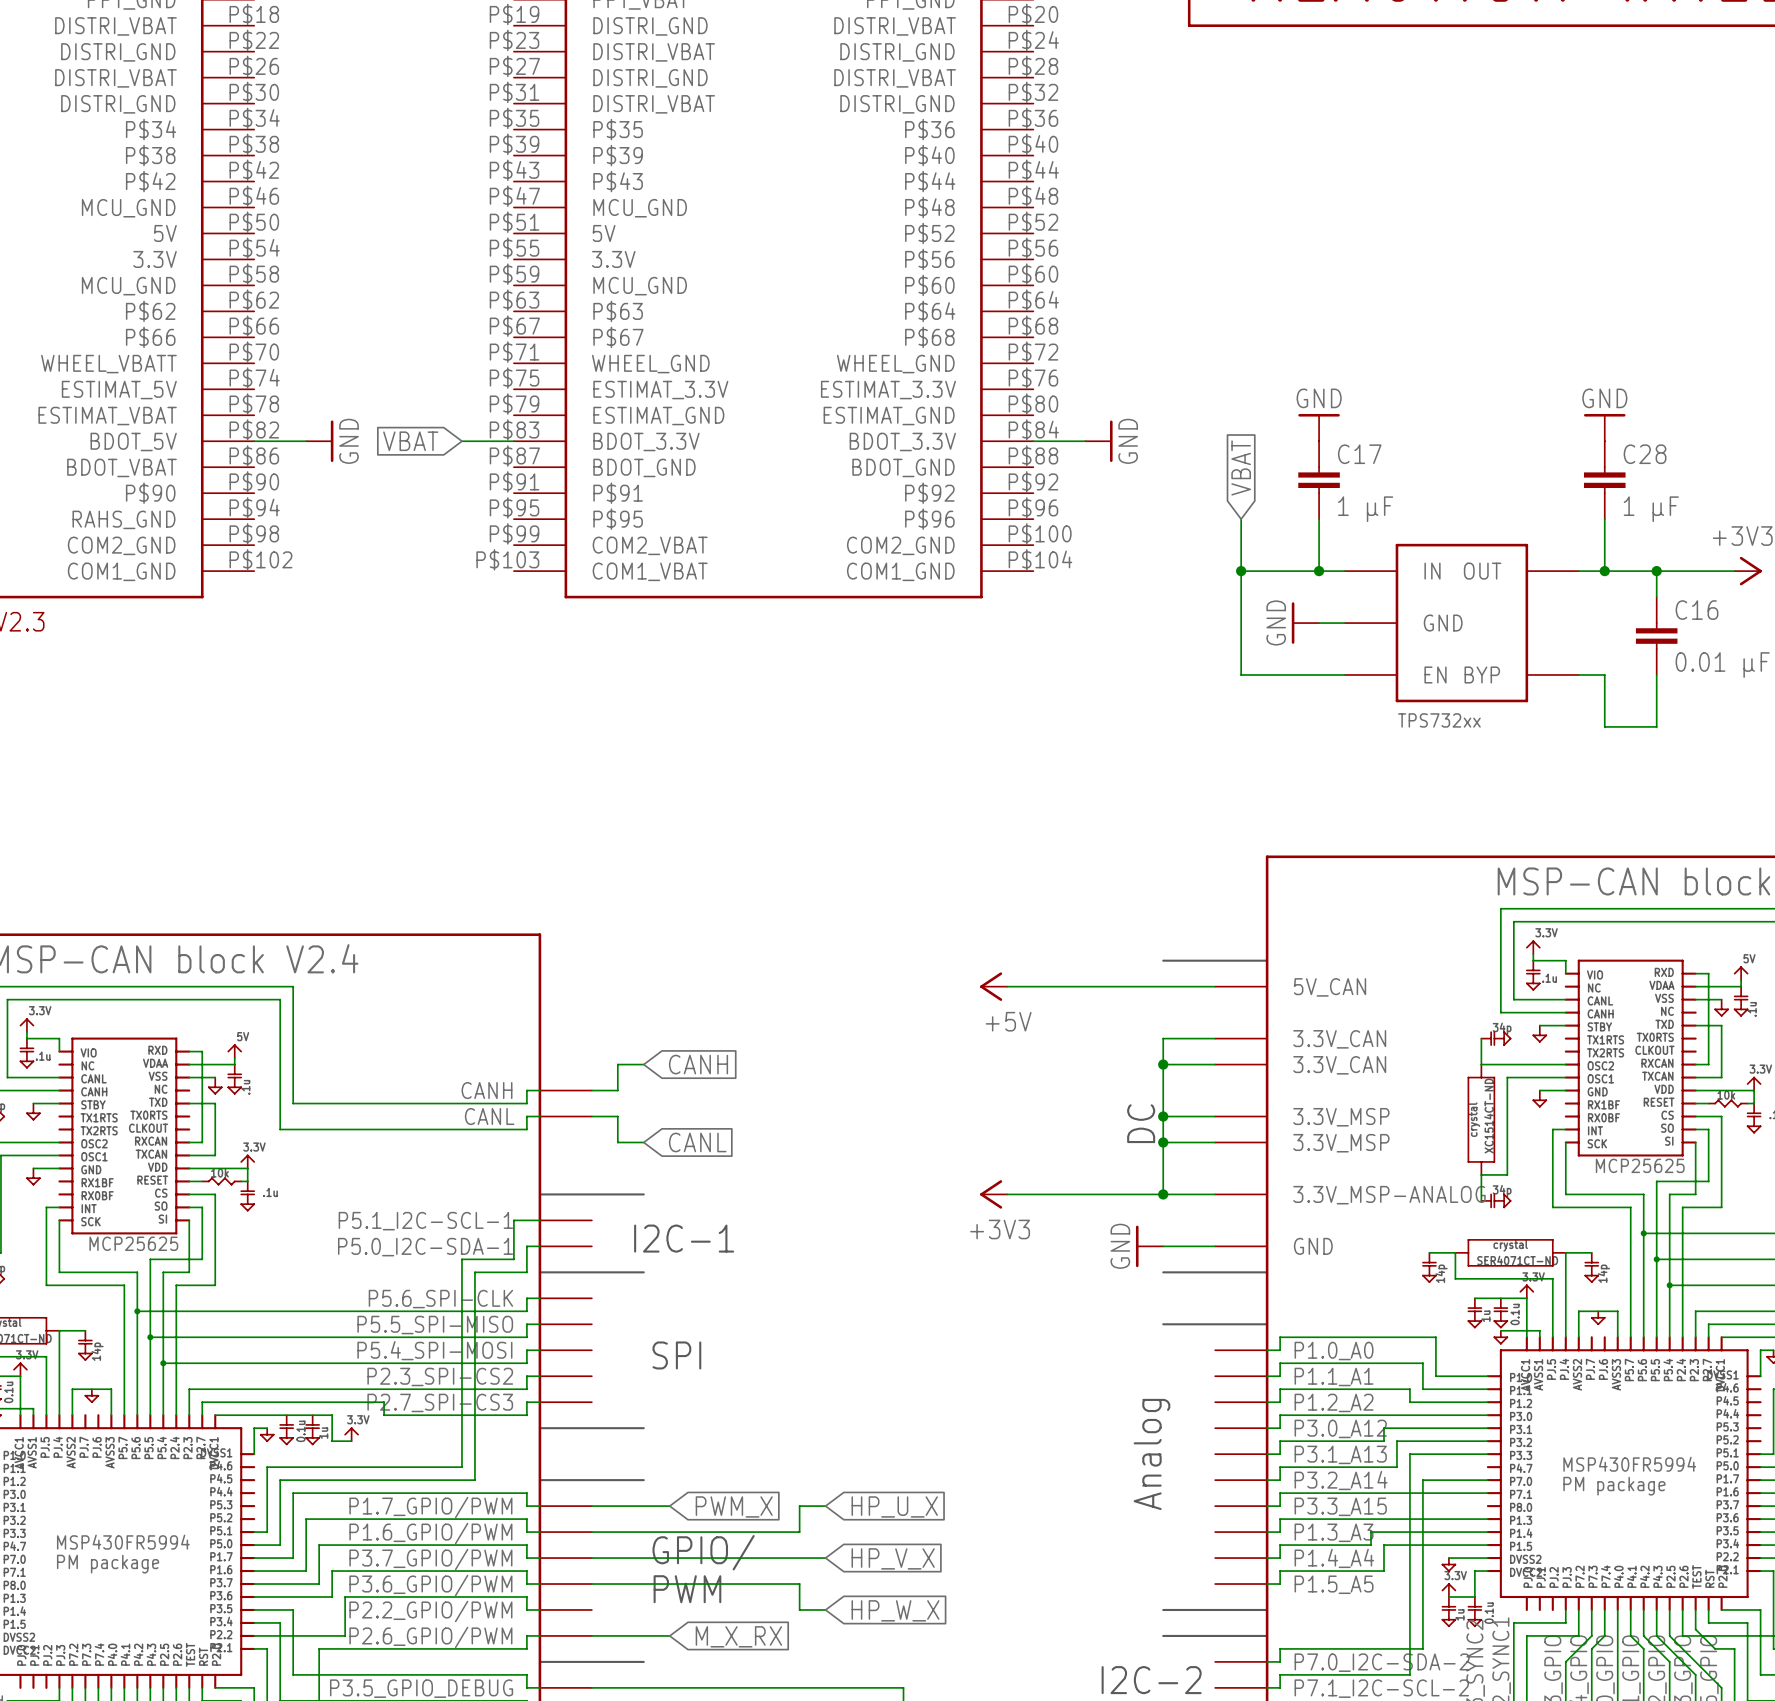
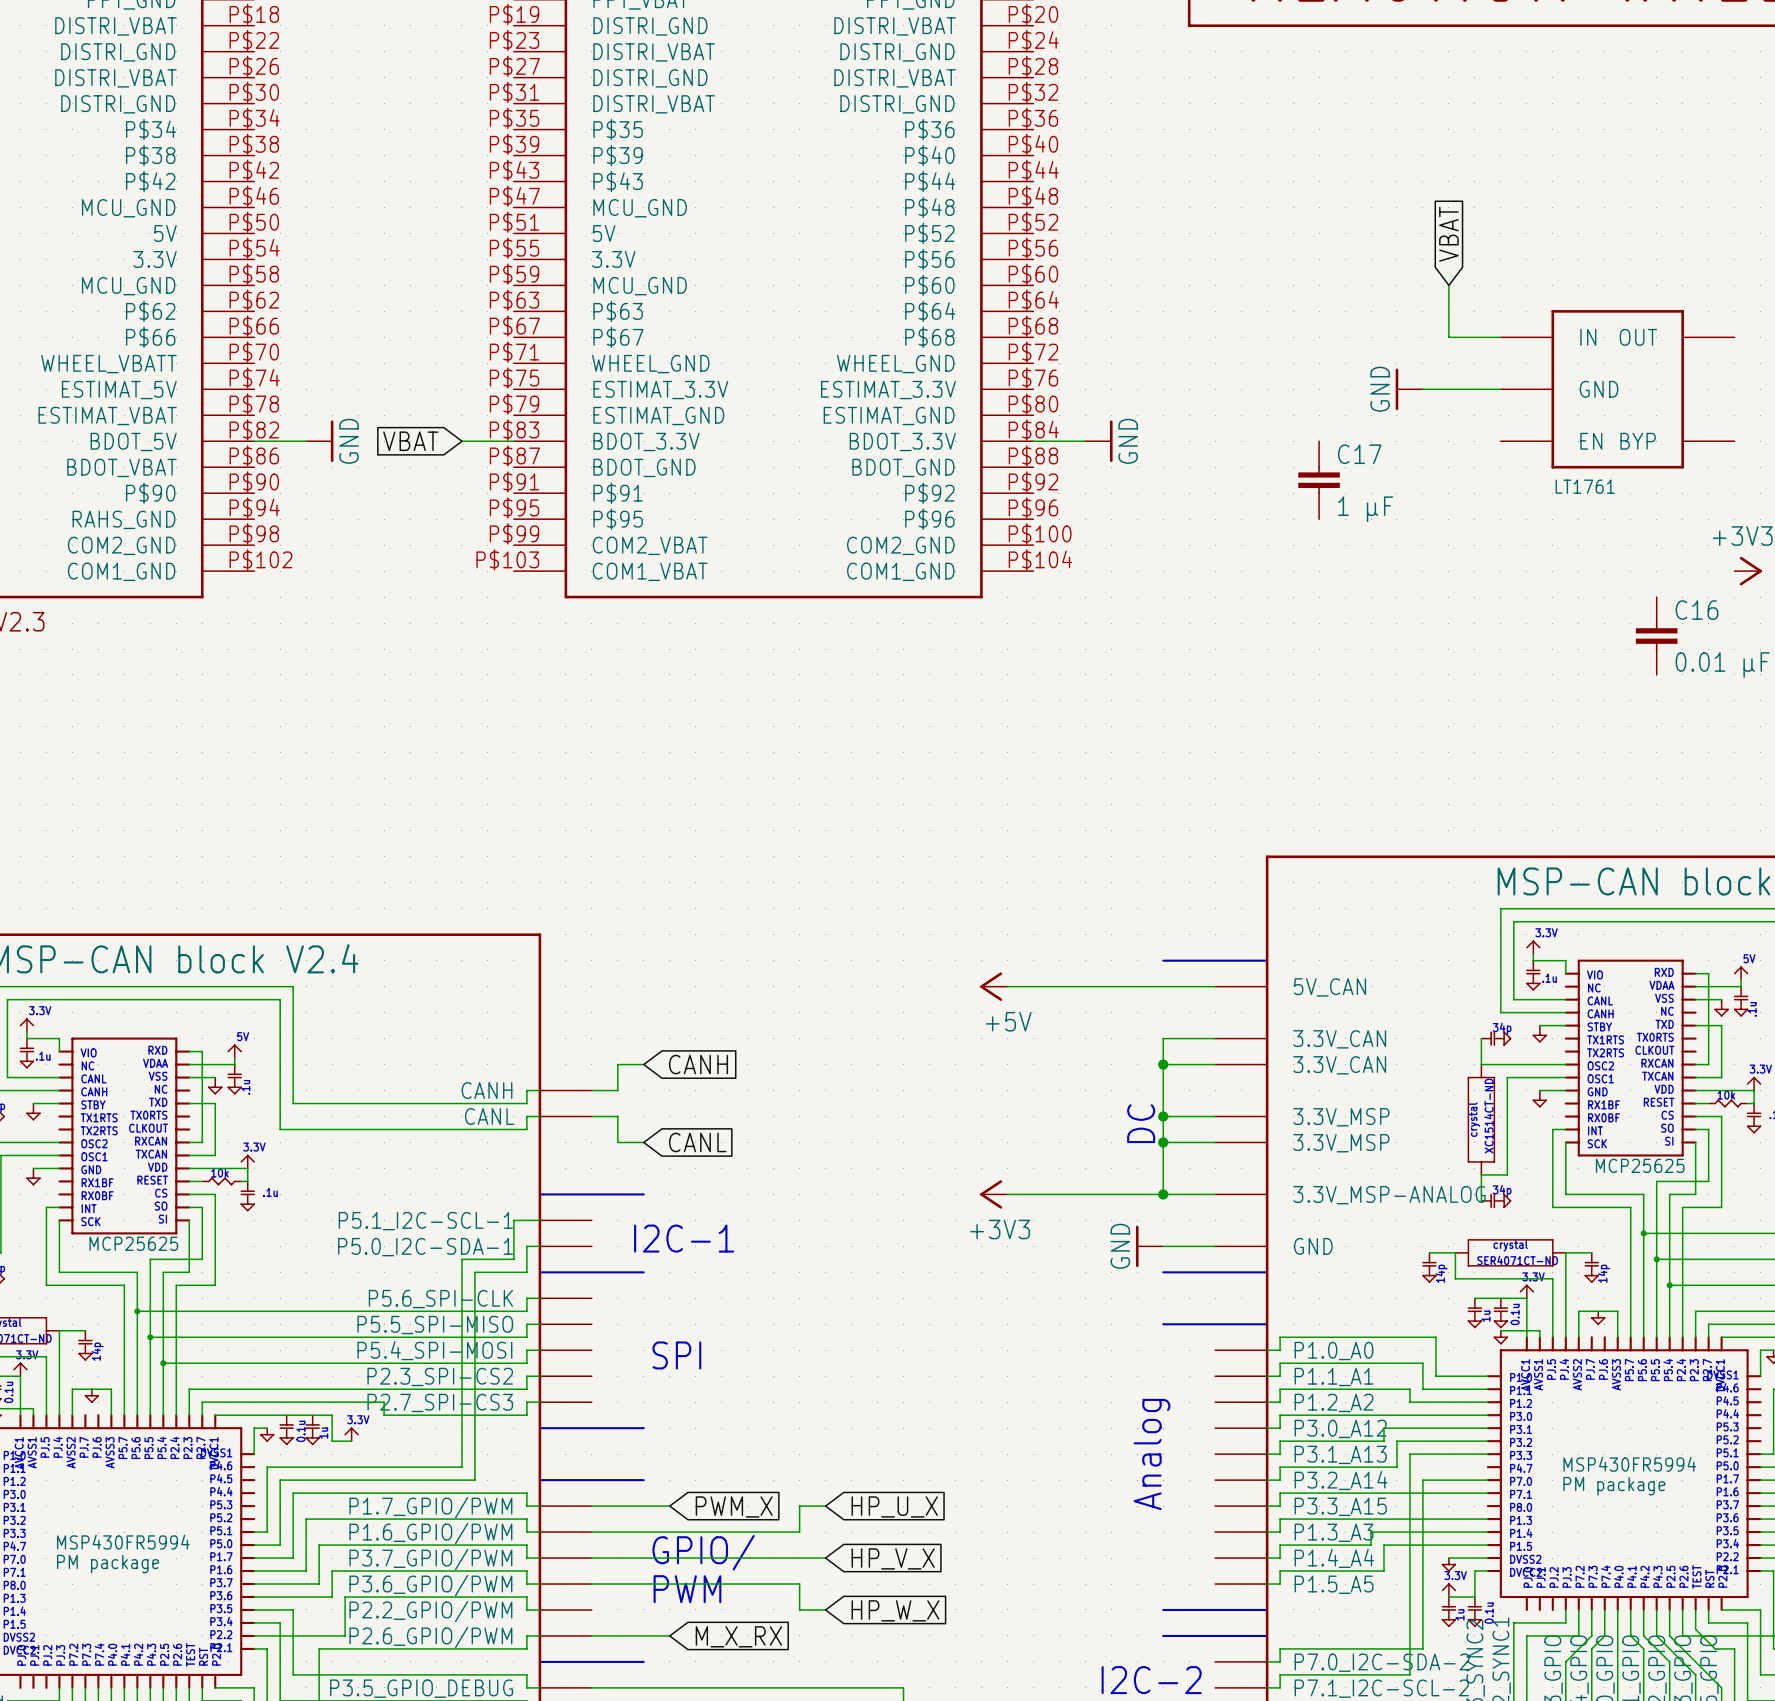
global label: none -> VBAT (1448, 234)
wire: none -> (1448, 285) (1448, 337) (1500, 337)
wire: none -> (1422, 389) (1500, 389)
part: none -> (1617, 389)
power symbol rotation: 0° (1319, 415) -> 90° counterclockwise (1396, 389)
power symbol position: GND (1319, 427) -> GND (1409, 389)
power symbol: GND (1604, 427) -> none
global label: VBAT (1241, 467) -> none
C28: 1 μF (1604, 480) -> none
wire: (1241, 519) (1241, 674) (1345, 674) -> none
wire: (1319, 519) (1319, 571) -> none
wire: (1604, 519) (1604, 571) -> none
wire: (1241, 571) (1345, 571) -> none
junction: (1241, 571) -> none
junction: (1319, 571) -> none
wire: (1578, 571) (1734, 571) -> none
junction: (1604, 571) -> none
wire: (1656, 571) (1656, 597) -> none
junction: (1656, 571) -> none
power symbol: GND (1305, 623) -> none
wire: (1319, 623) (1345, 623) -> none
part: (1461, 623) -> none
wire: (1578, 674) (1604, 674) (1604, 726) (1656, 726) (1656, 674) -> none

